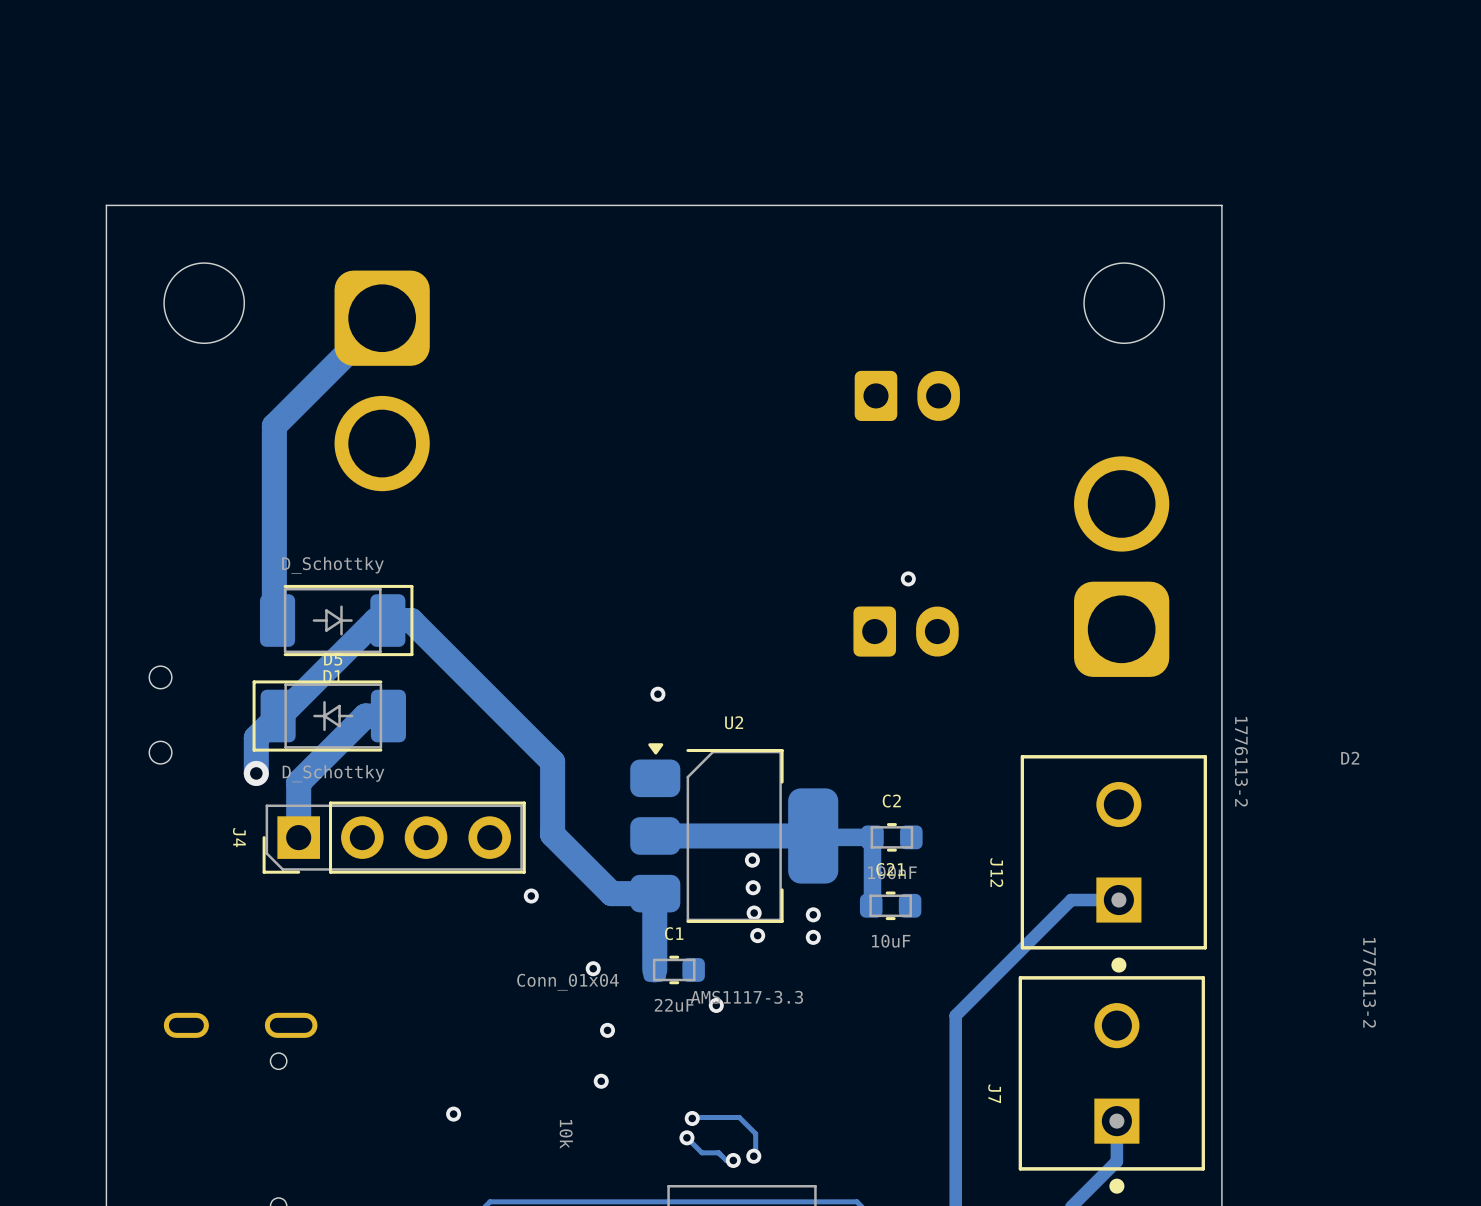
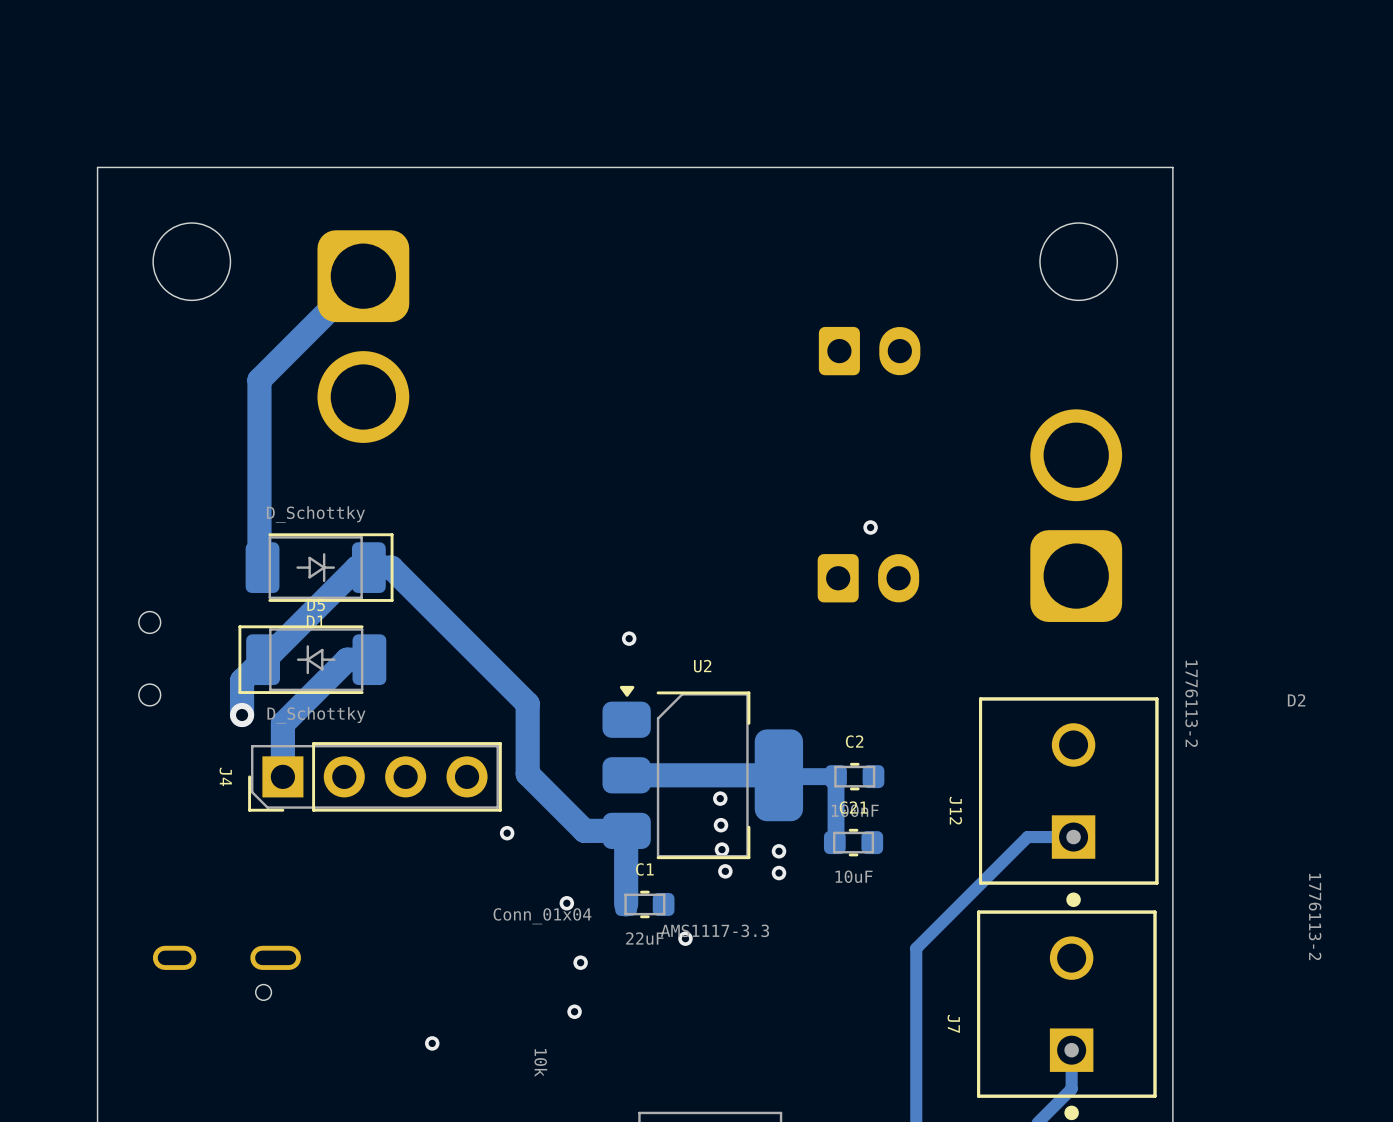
track: (692, 1118) (739, 1117) (755, 1133) (755, 1154) (753, 1156) -> none
via: (692, 1118) -> none
track: (686, 1137) (701, 1152) (718, 1152) (726, 1160) (733, 1160) -> none
via: (686, 1137) -> none
via: (753, 1156) -> none
via: (733, 1160) -> none

